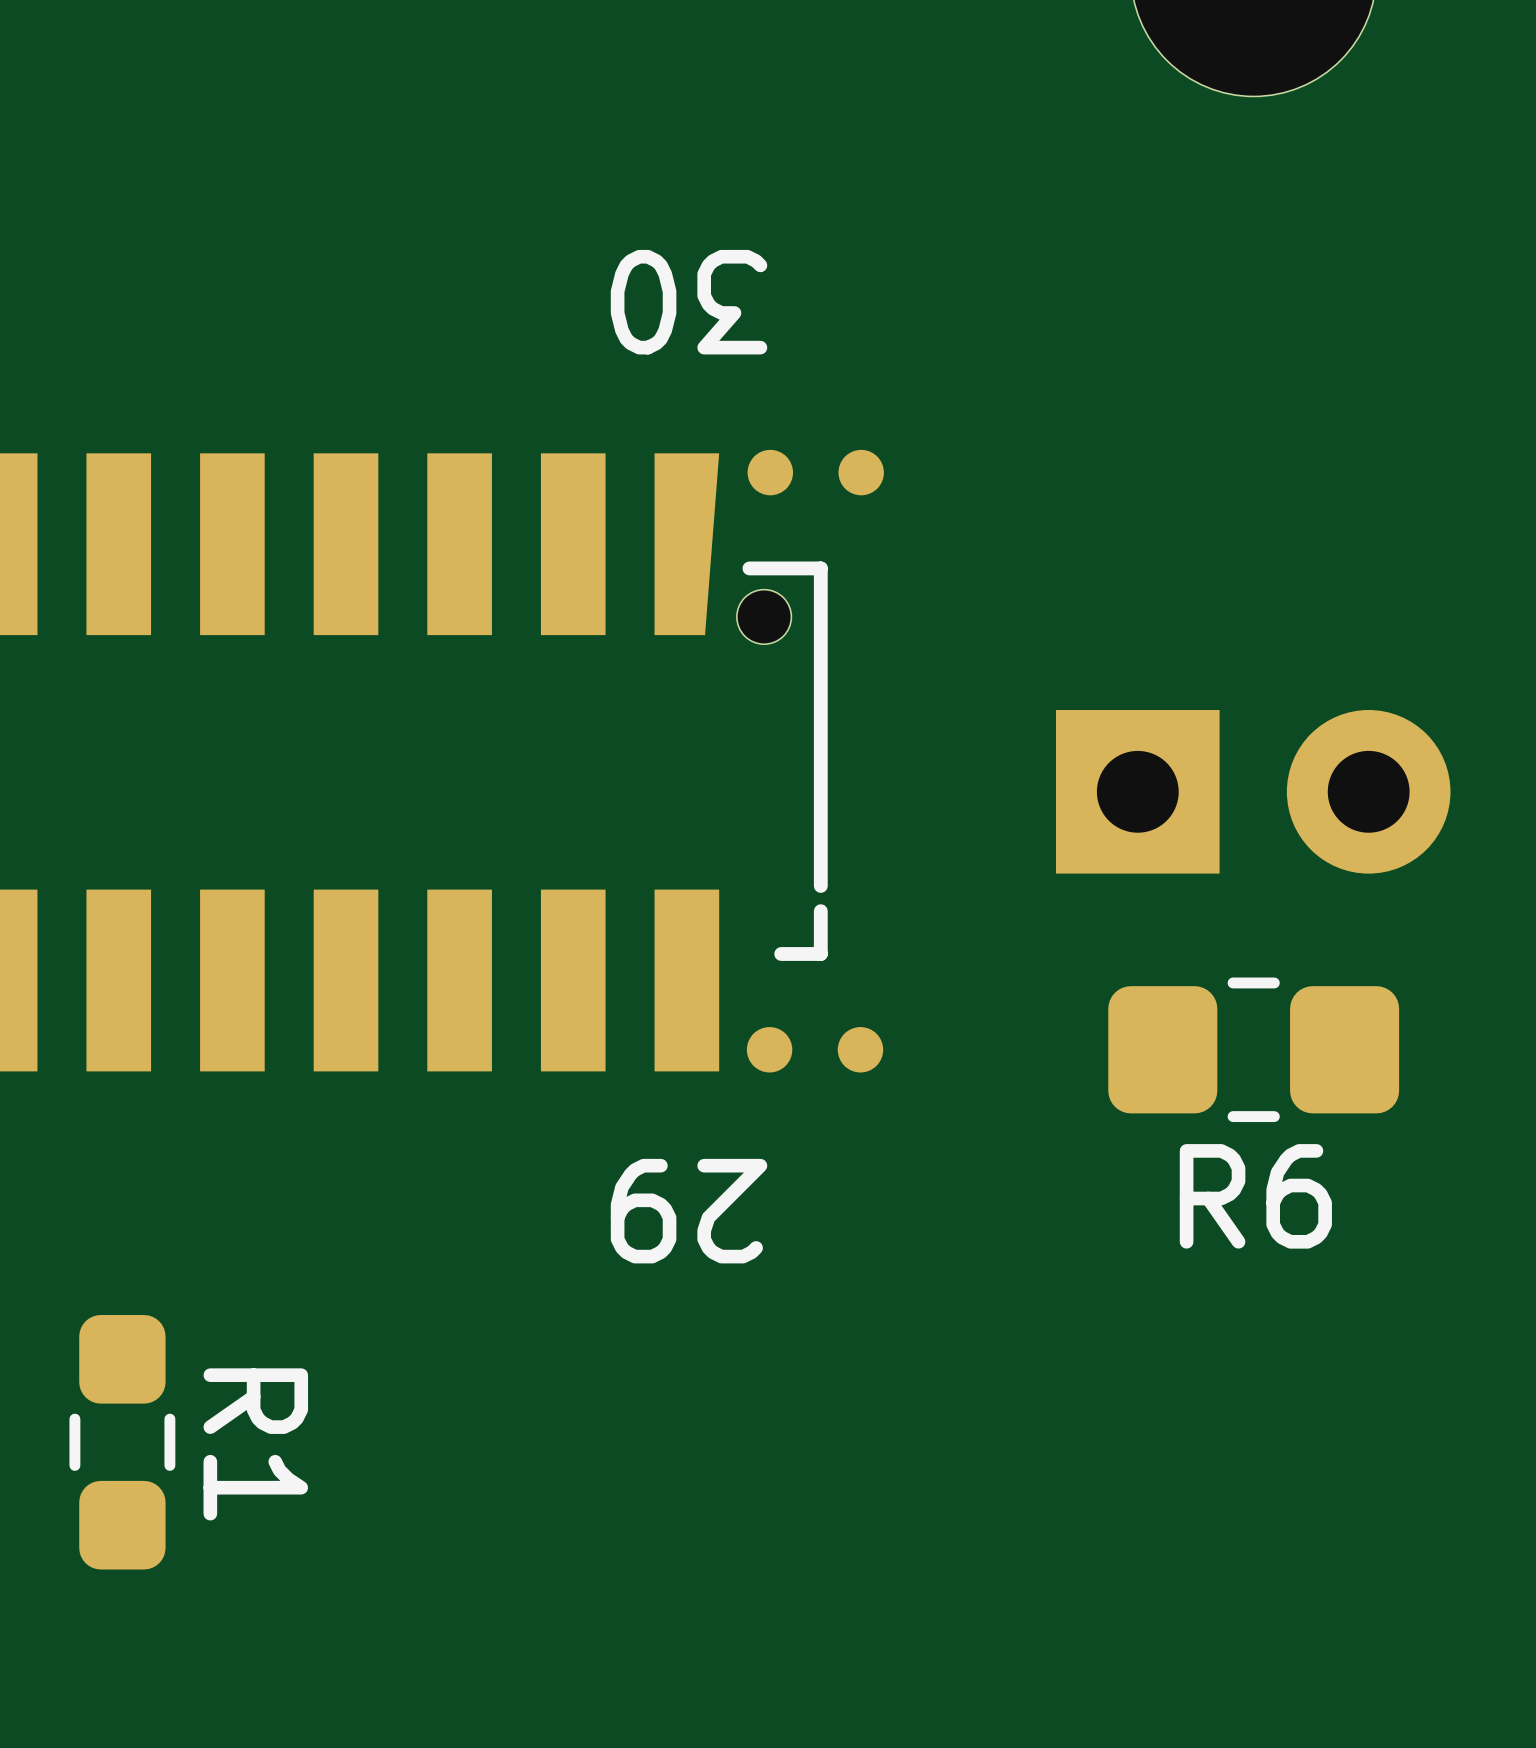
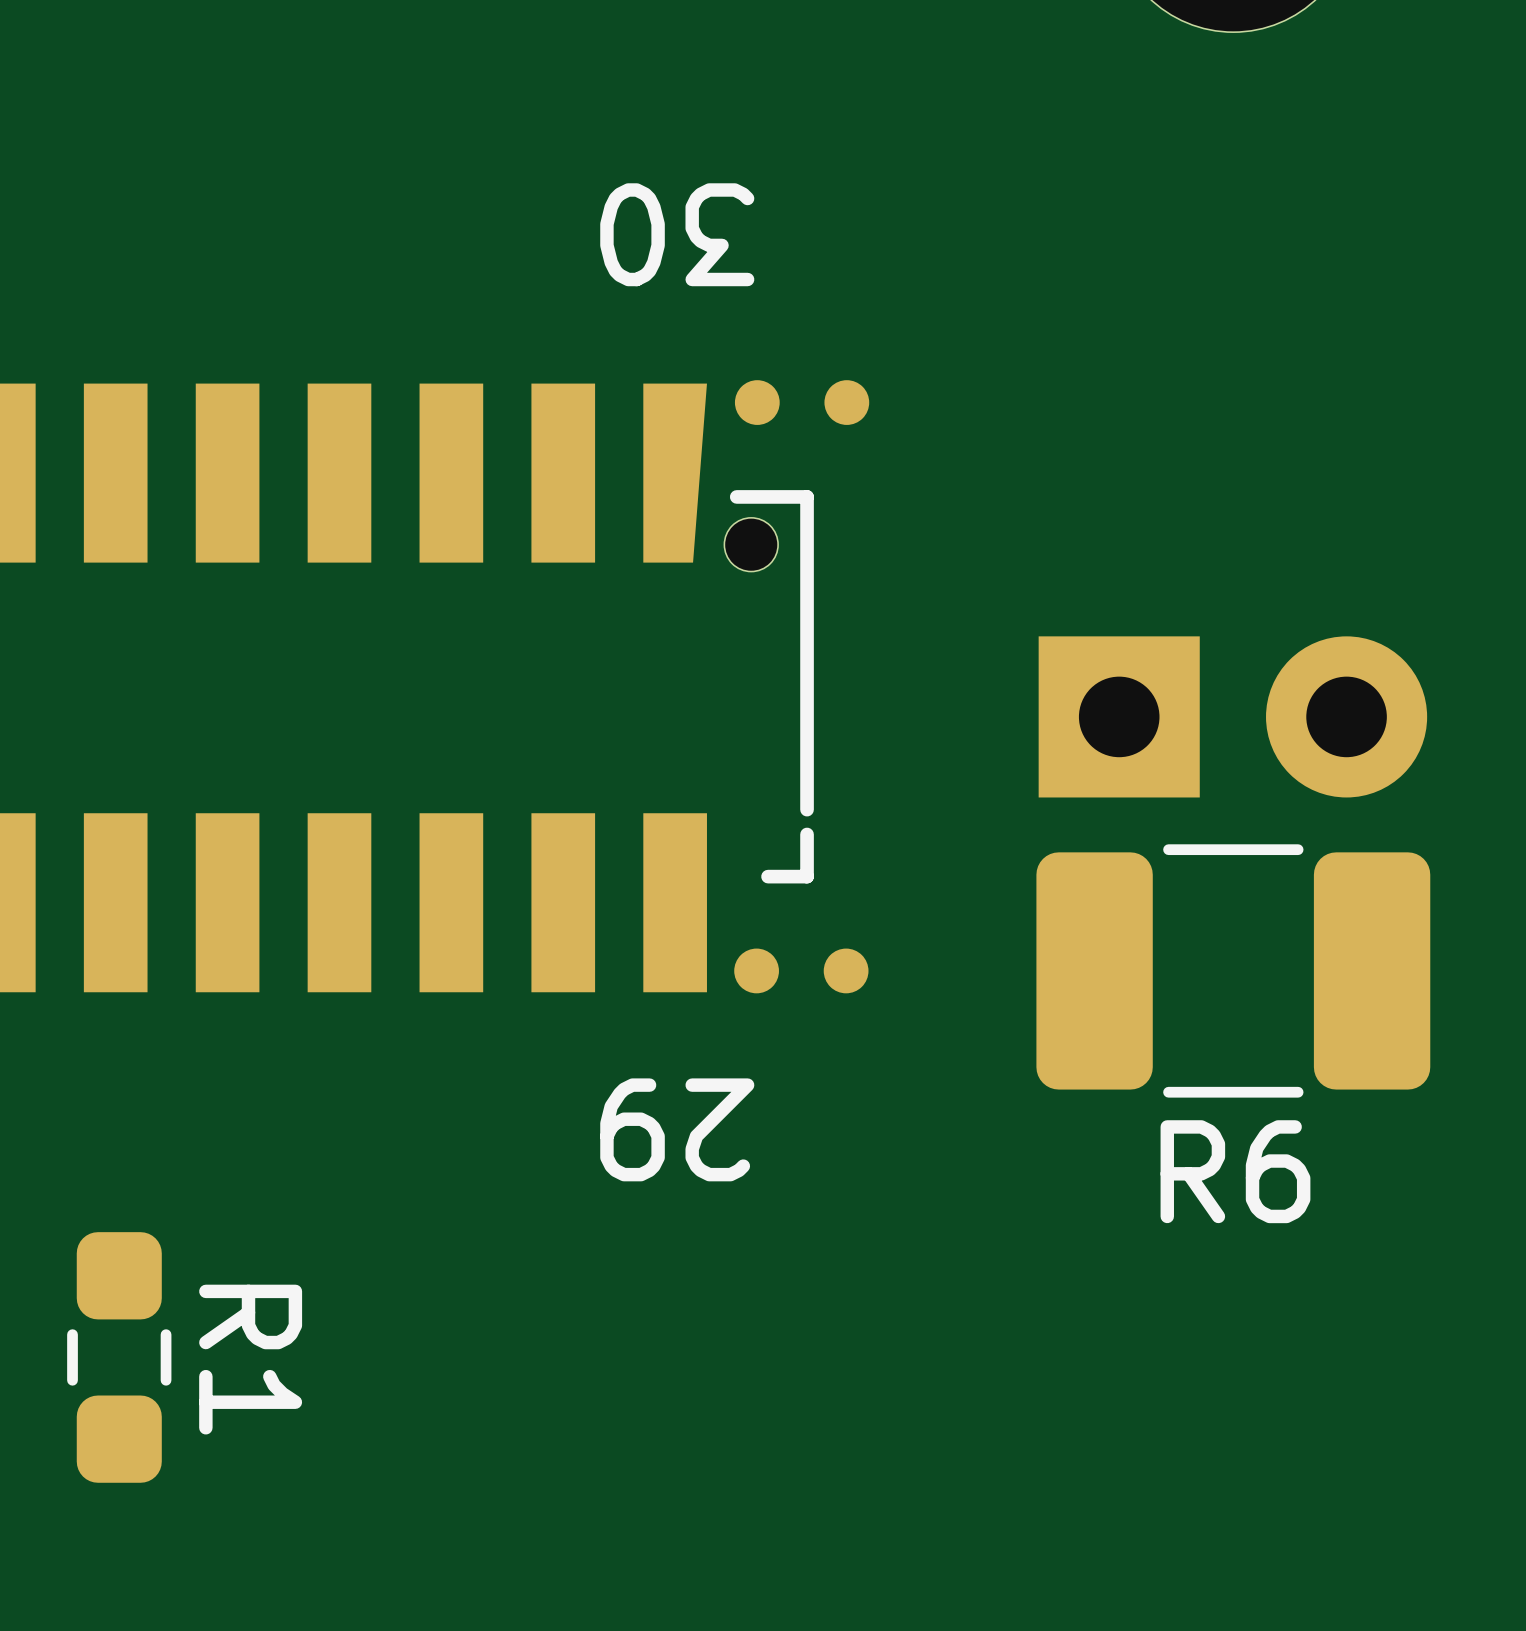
R6 footprint: [1108, 977, 1400, 1123] -> [1036, 844, 1431, 1098]
R6 name position: R6 (1255, 1196) -> R6 (1235, 1171)

